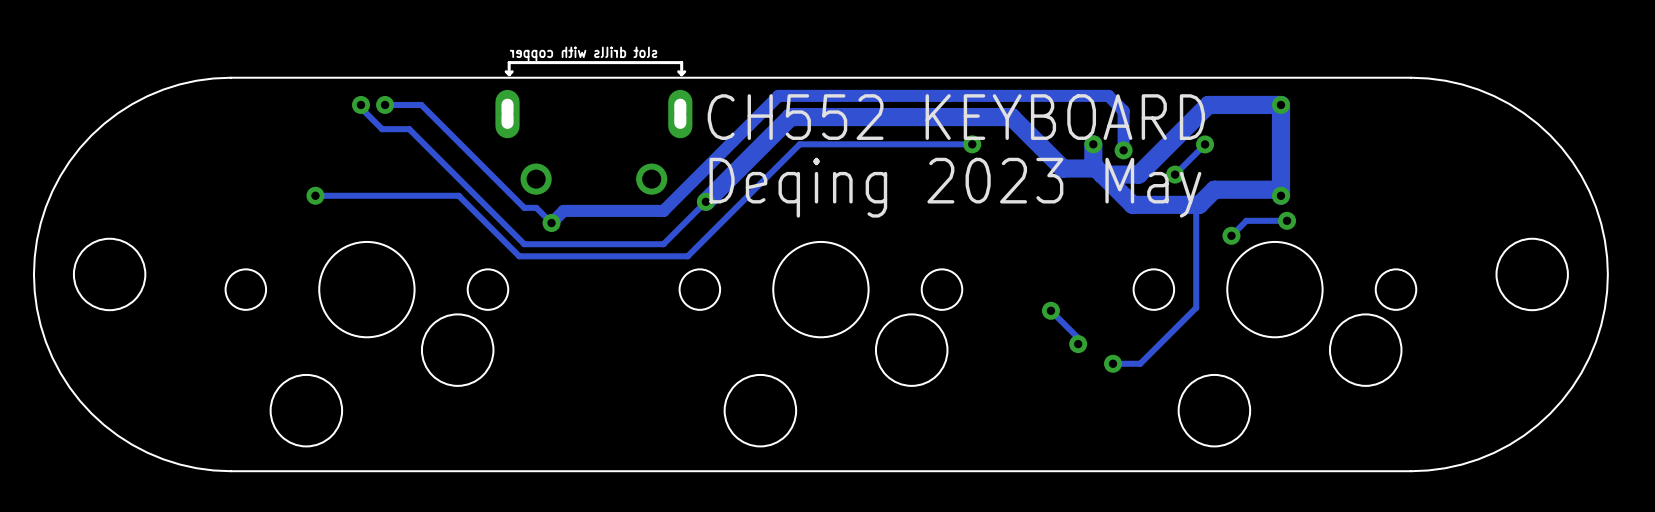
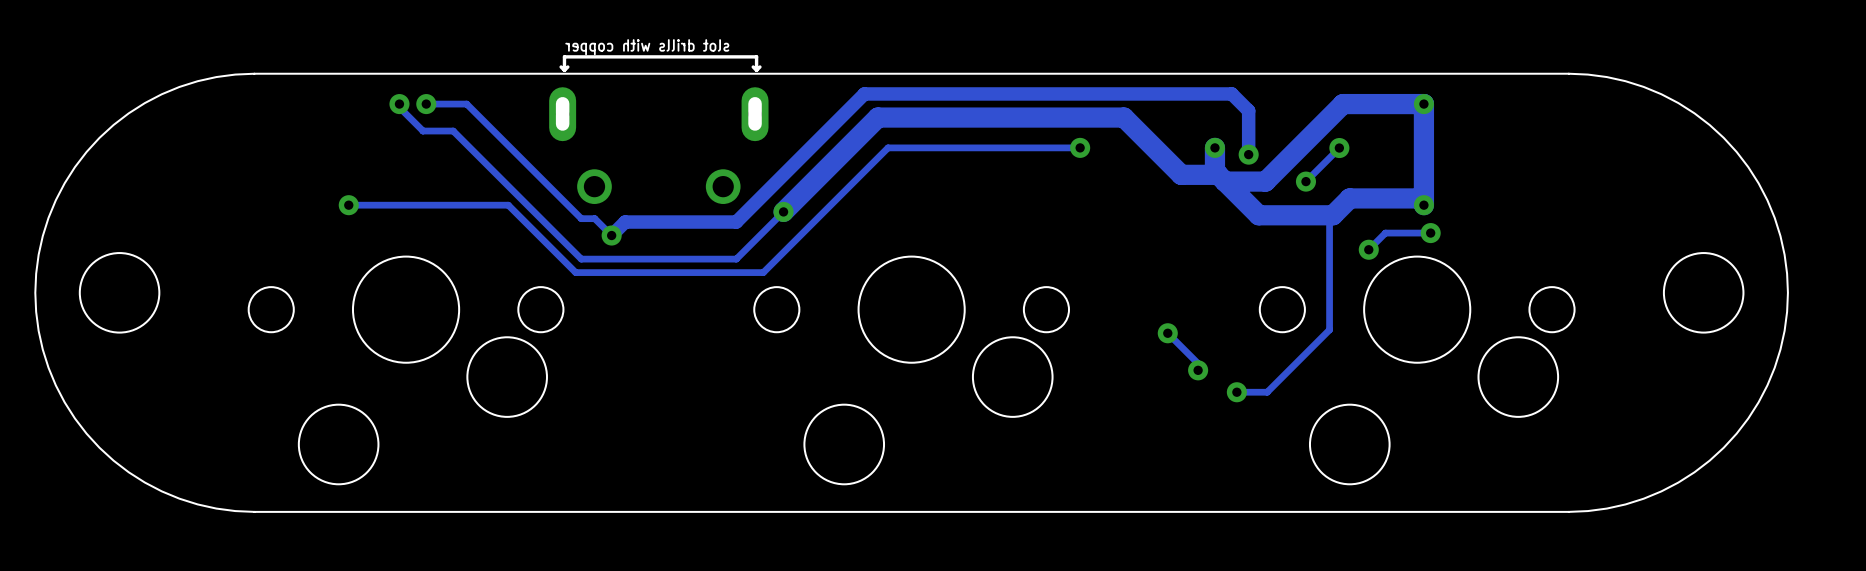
text: CH552 KEYBOARD (956, 117) -> none
text: Deqing 2023 May (955, 187) -> none

